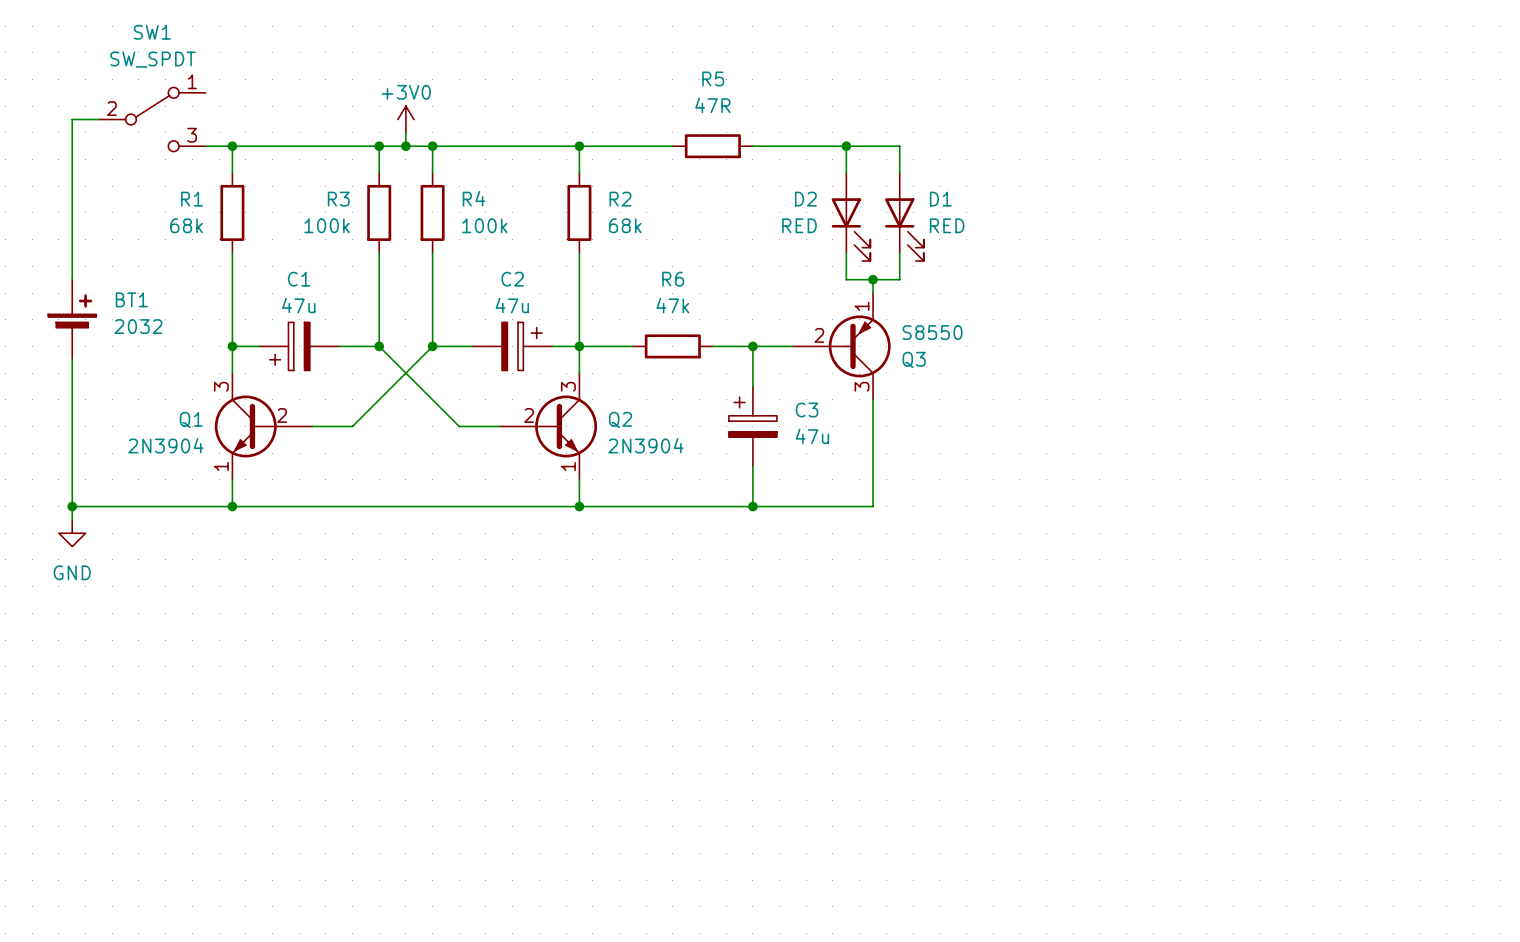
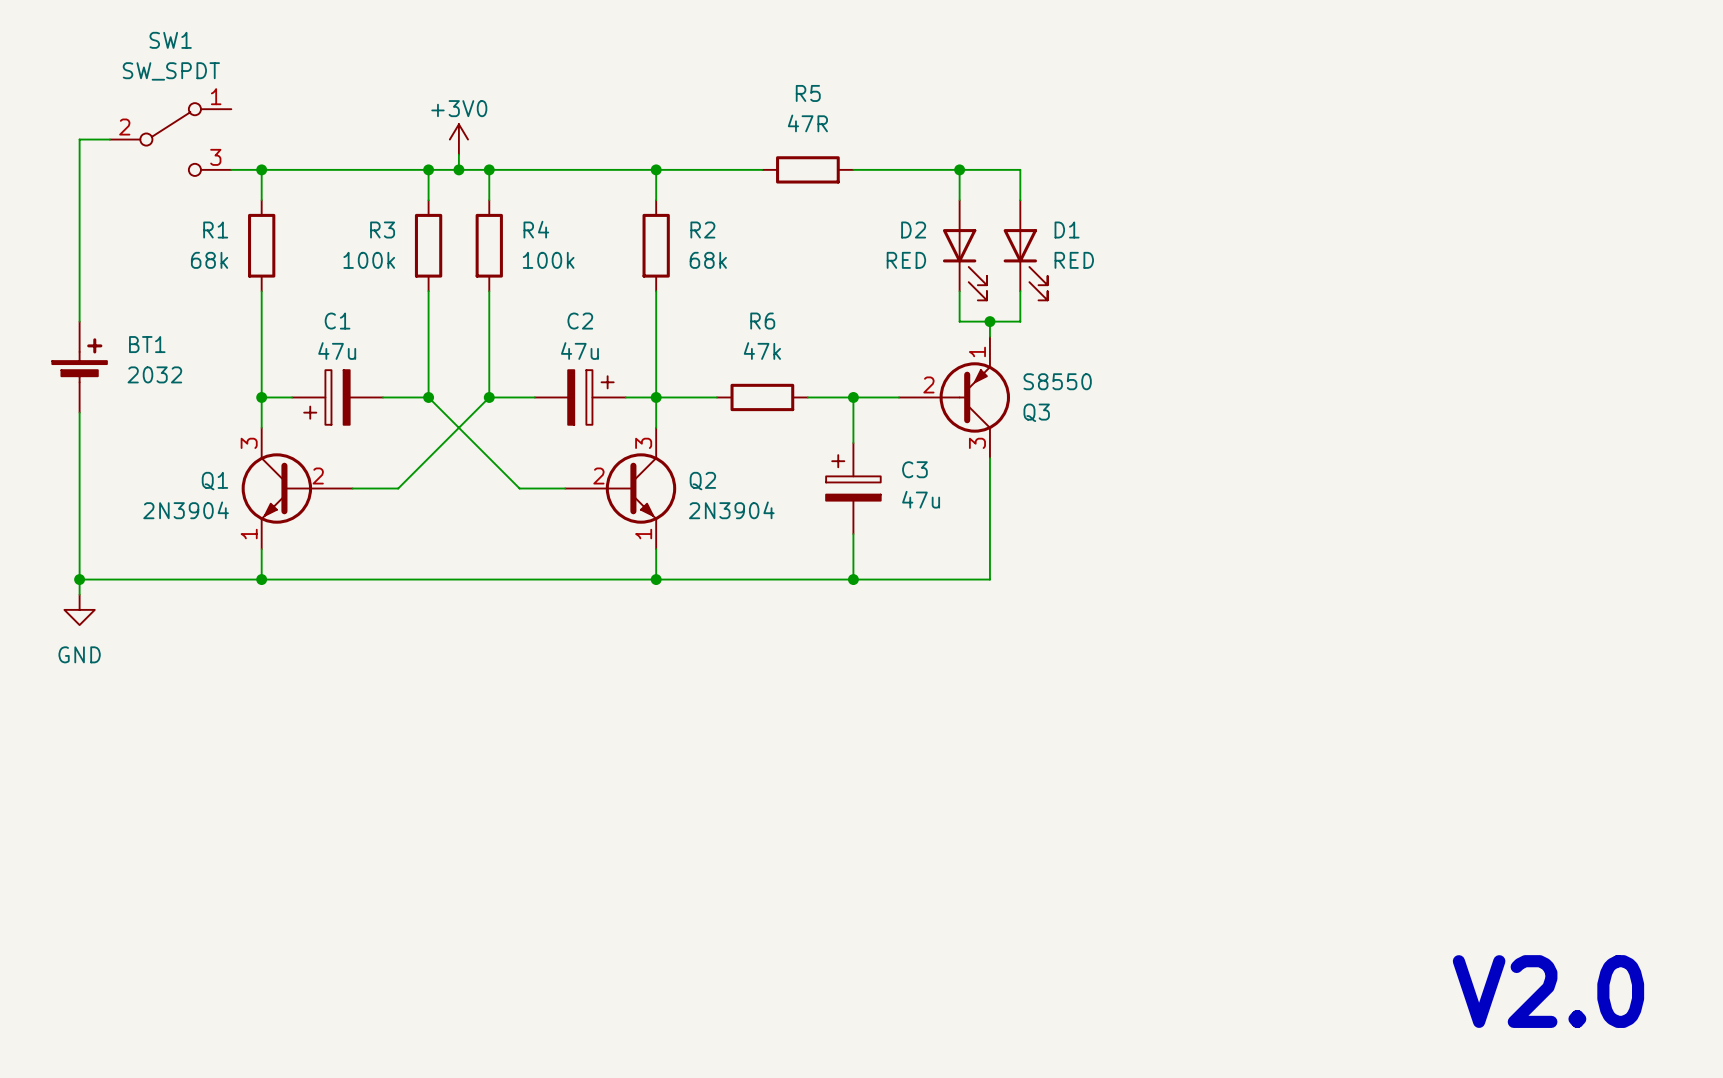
text: none -> V2.0 (1548, 991)

